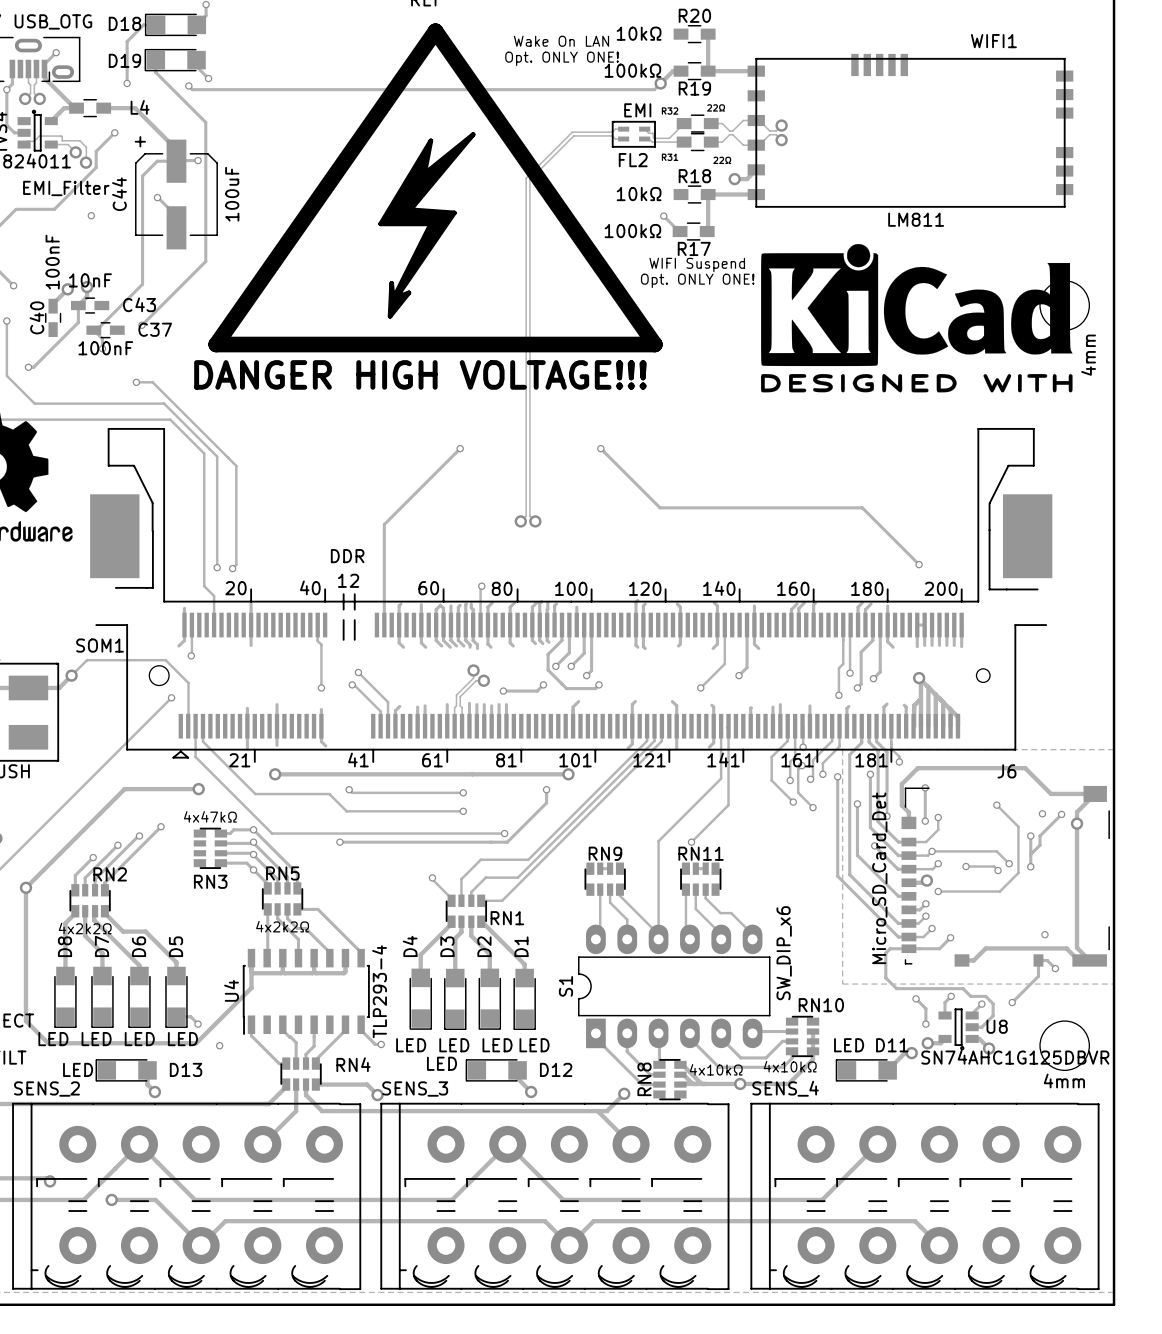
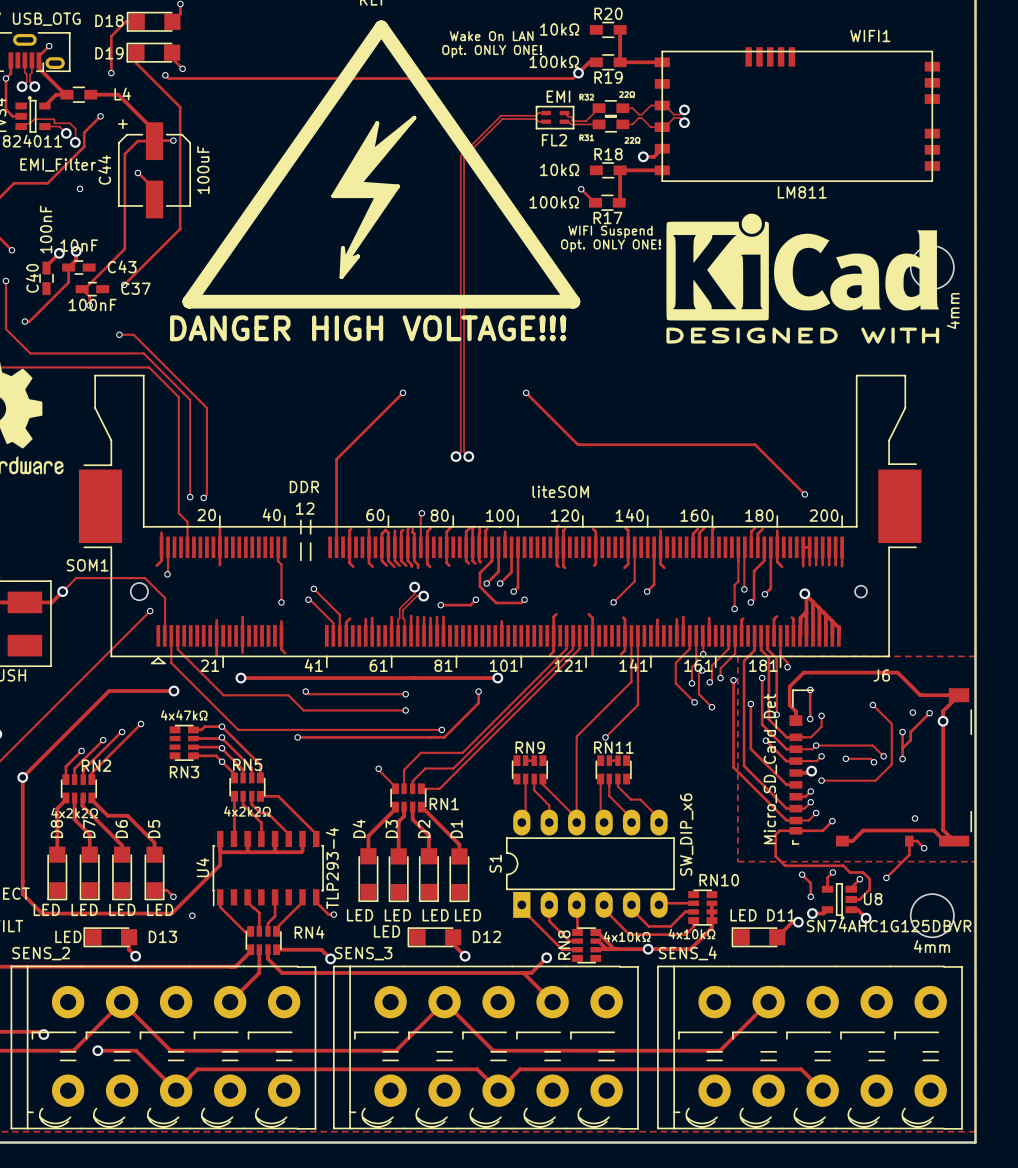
SOM1 footprint: [90, 427, 1053, 763] -> [78, 374, 922, 669]
SOM1 value: none -> liteSOM (560, 491)
track: (578, 701) (573, 709) -> none

